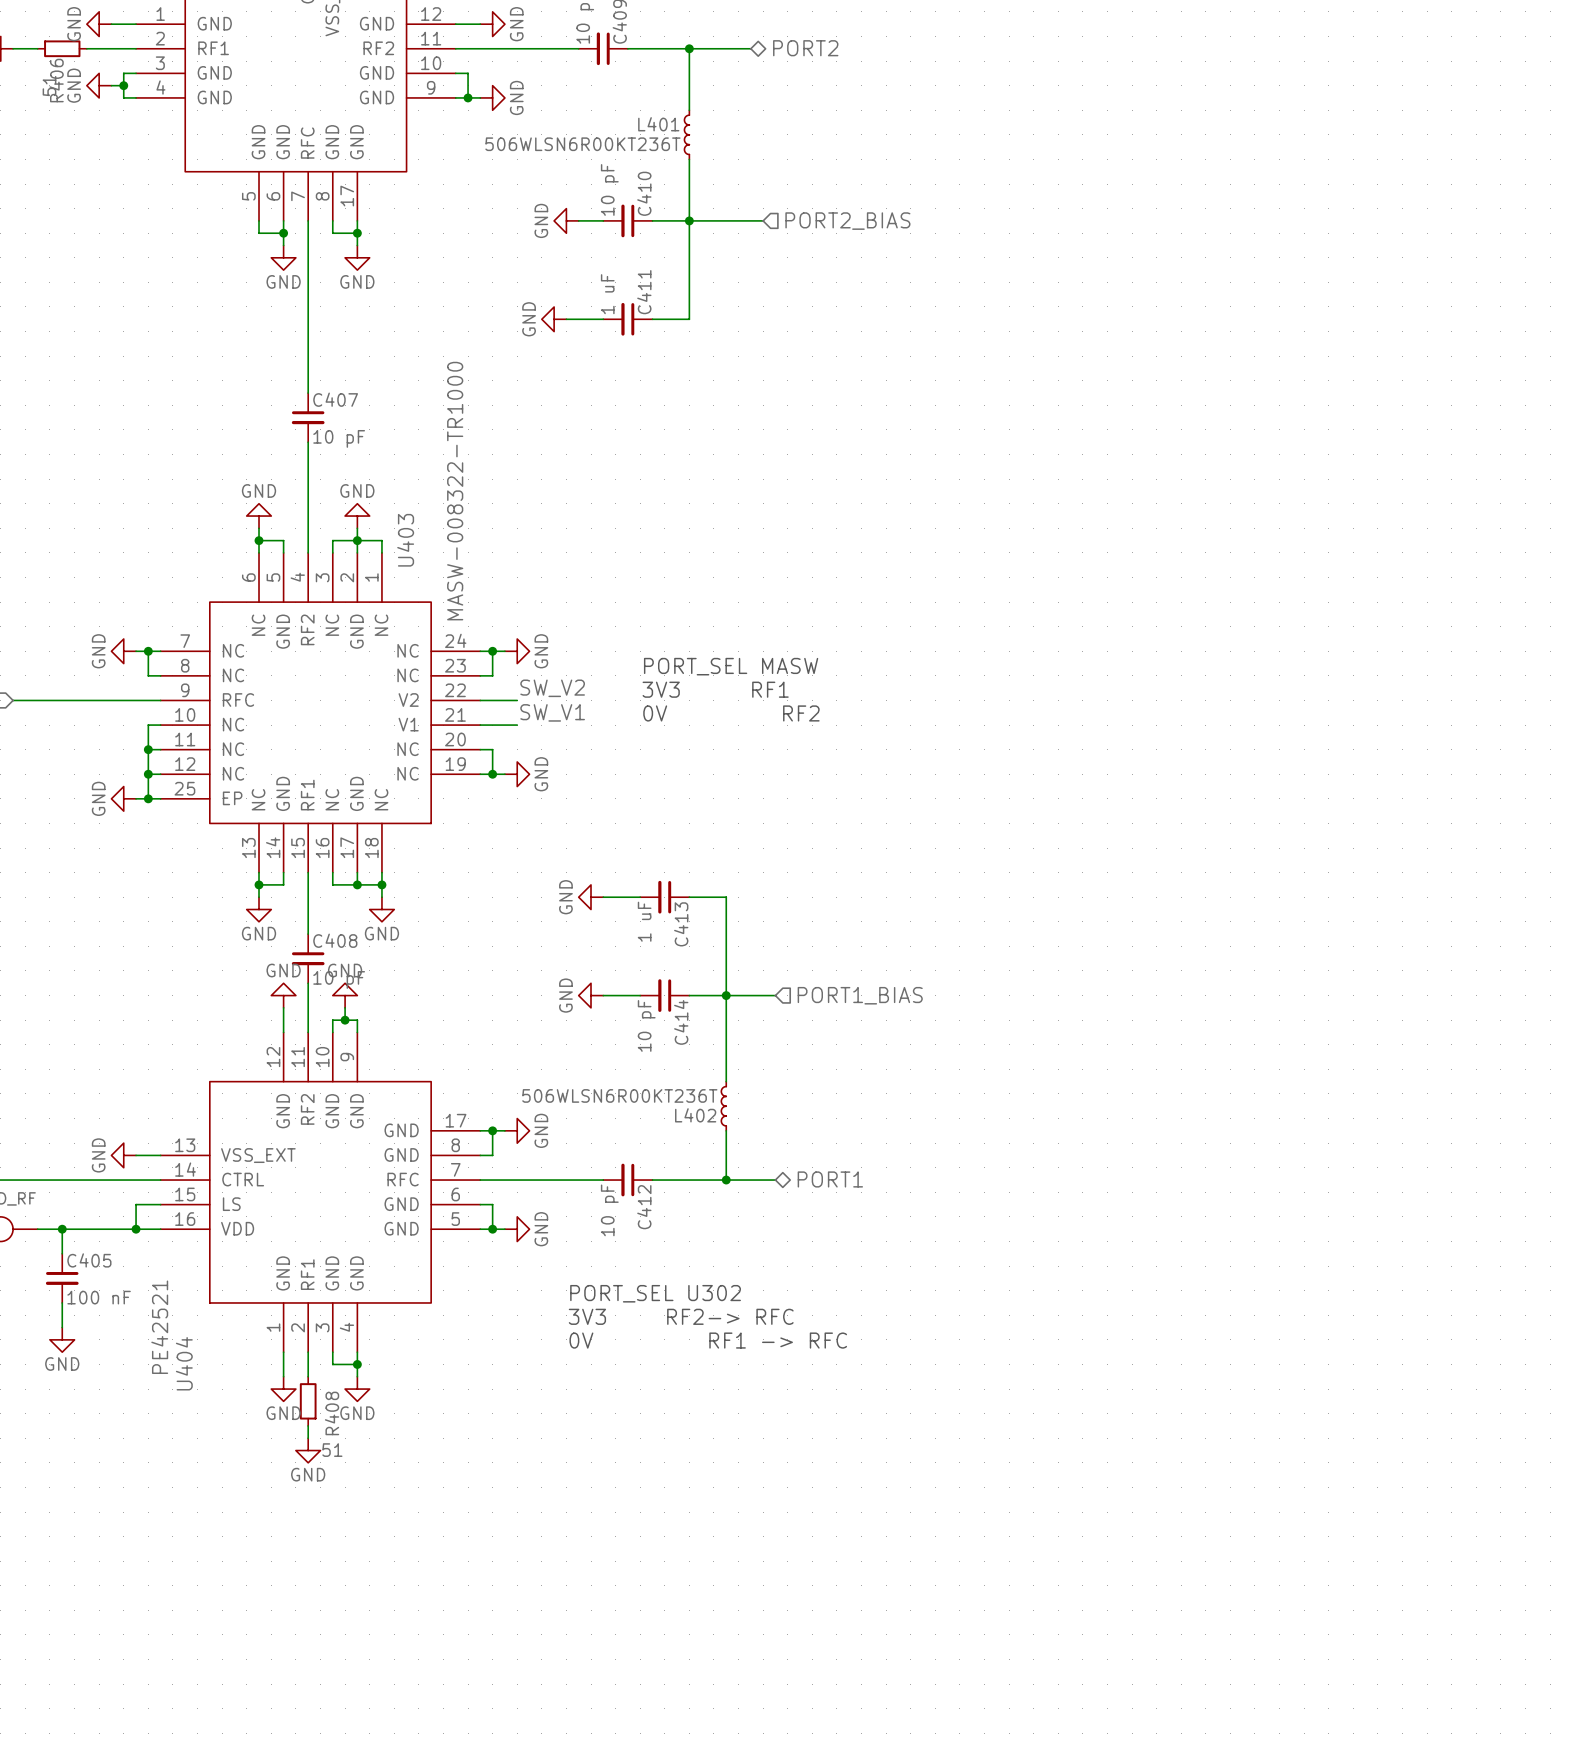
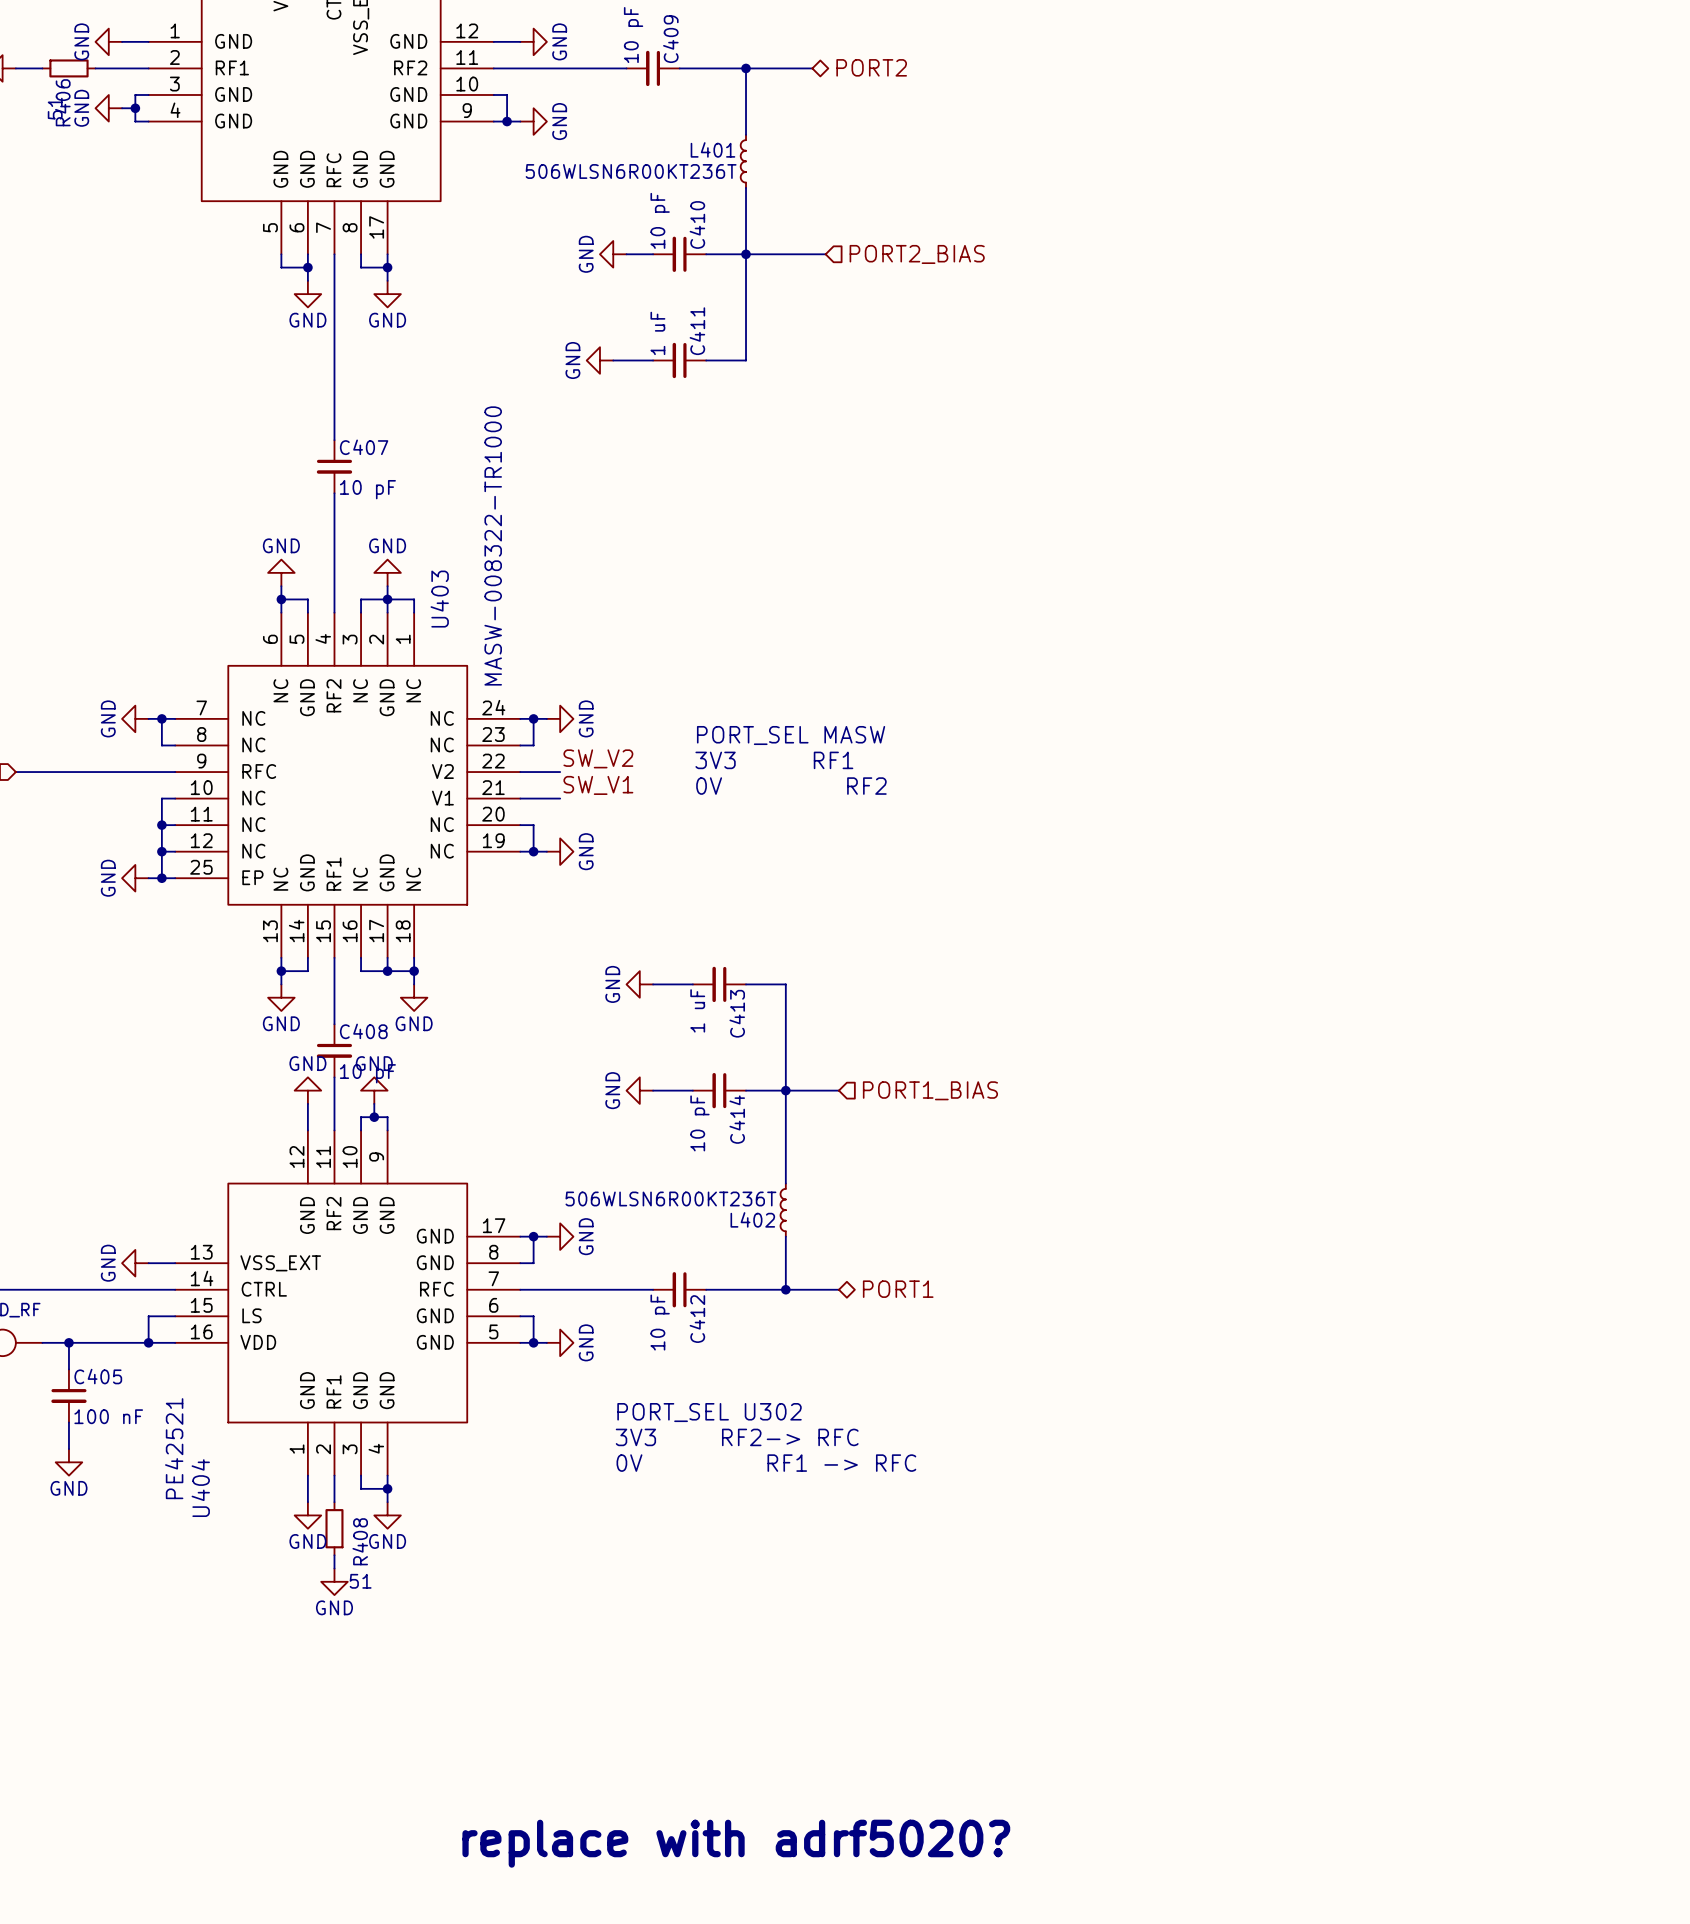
text: none -> replace with adrf5020? (736, 1843)

